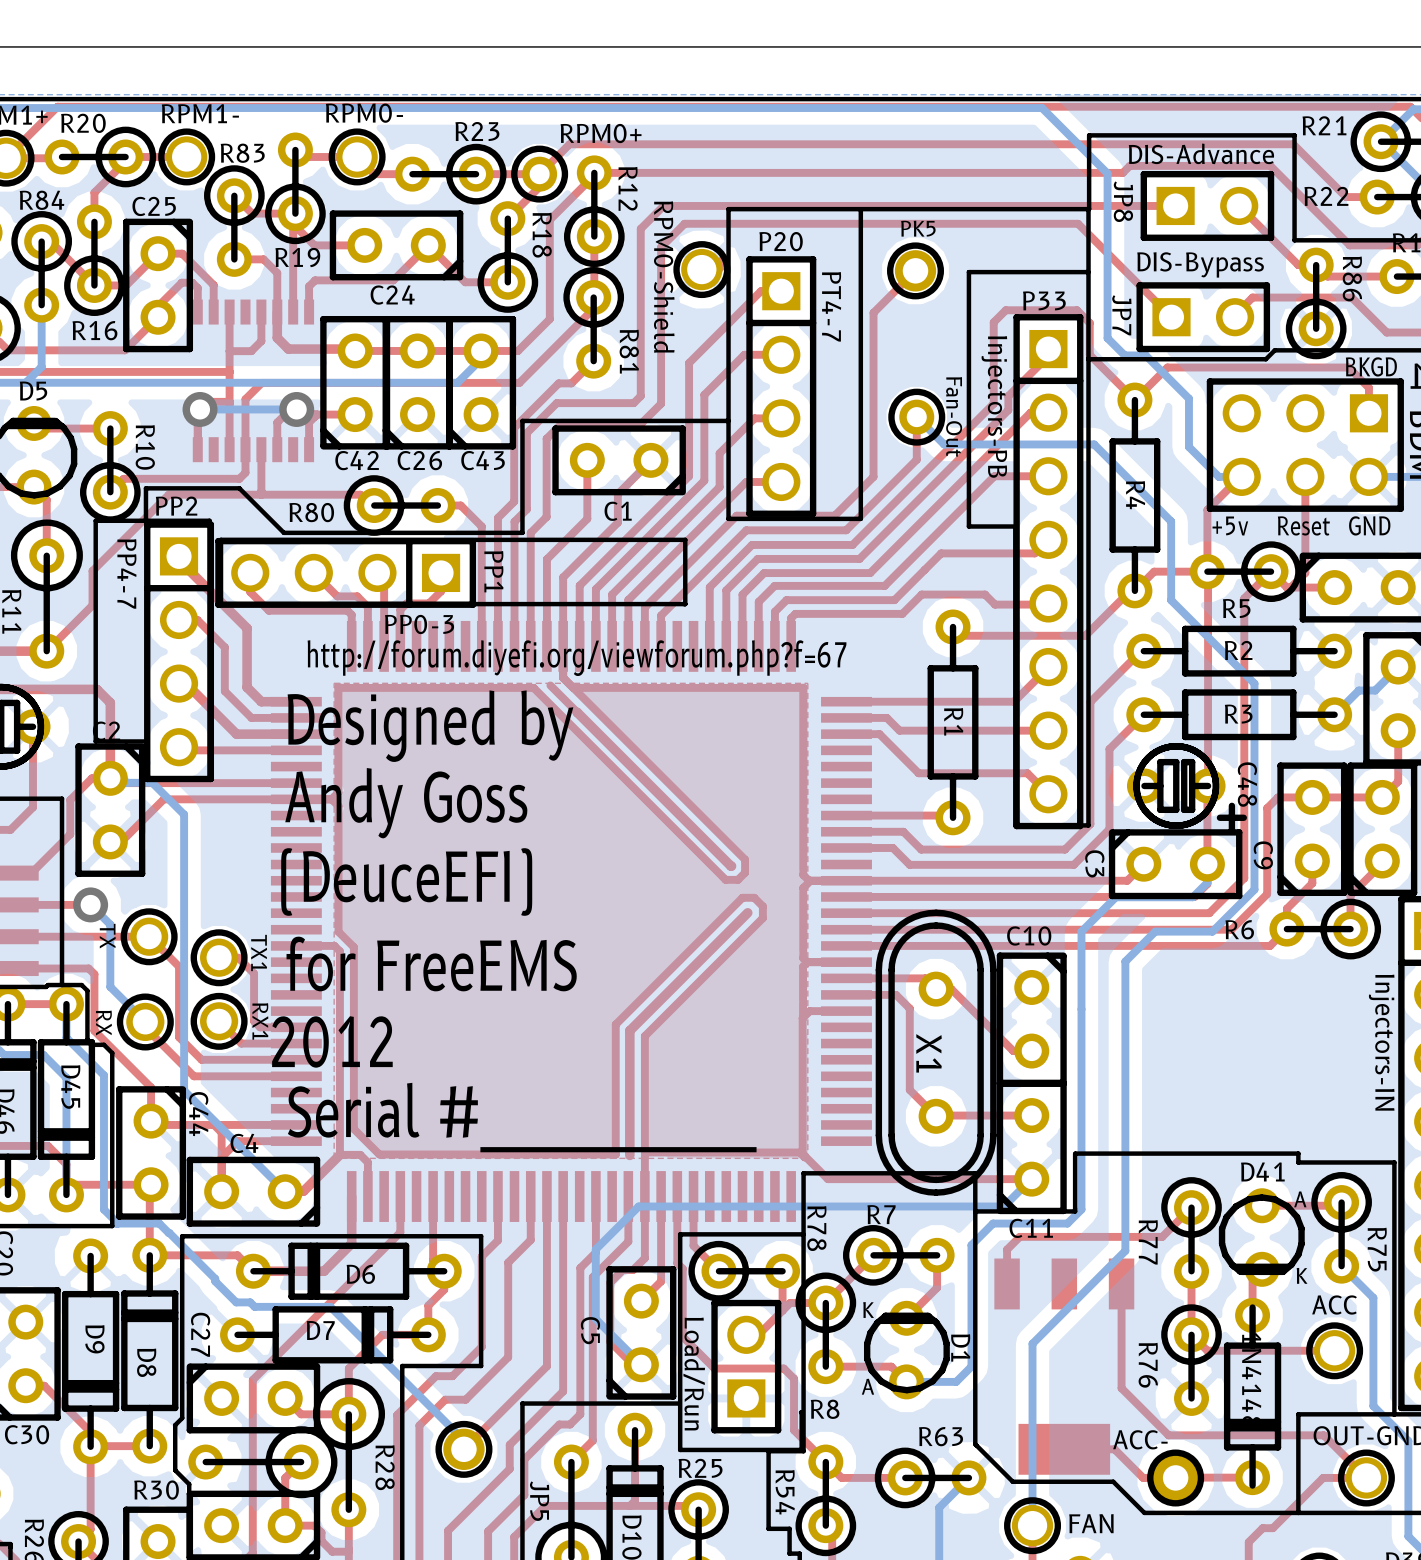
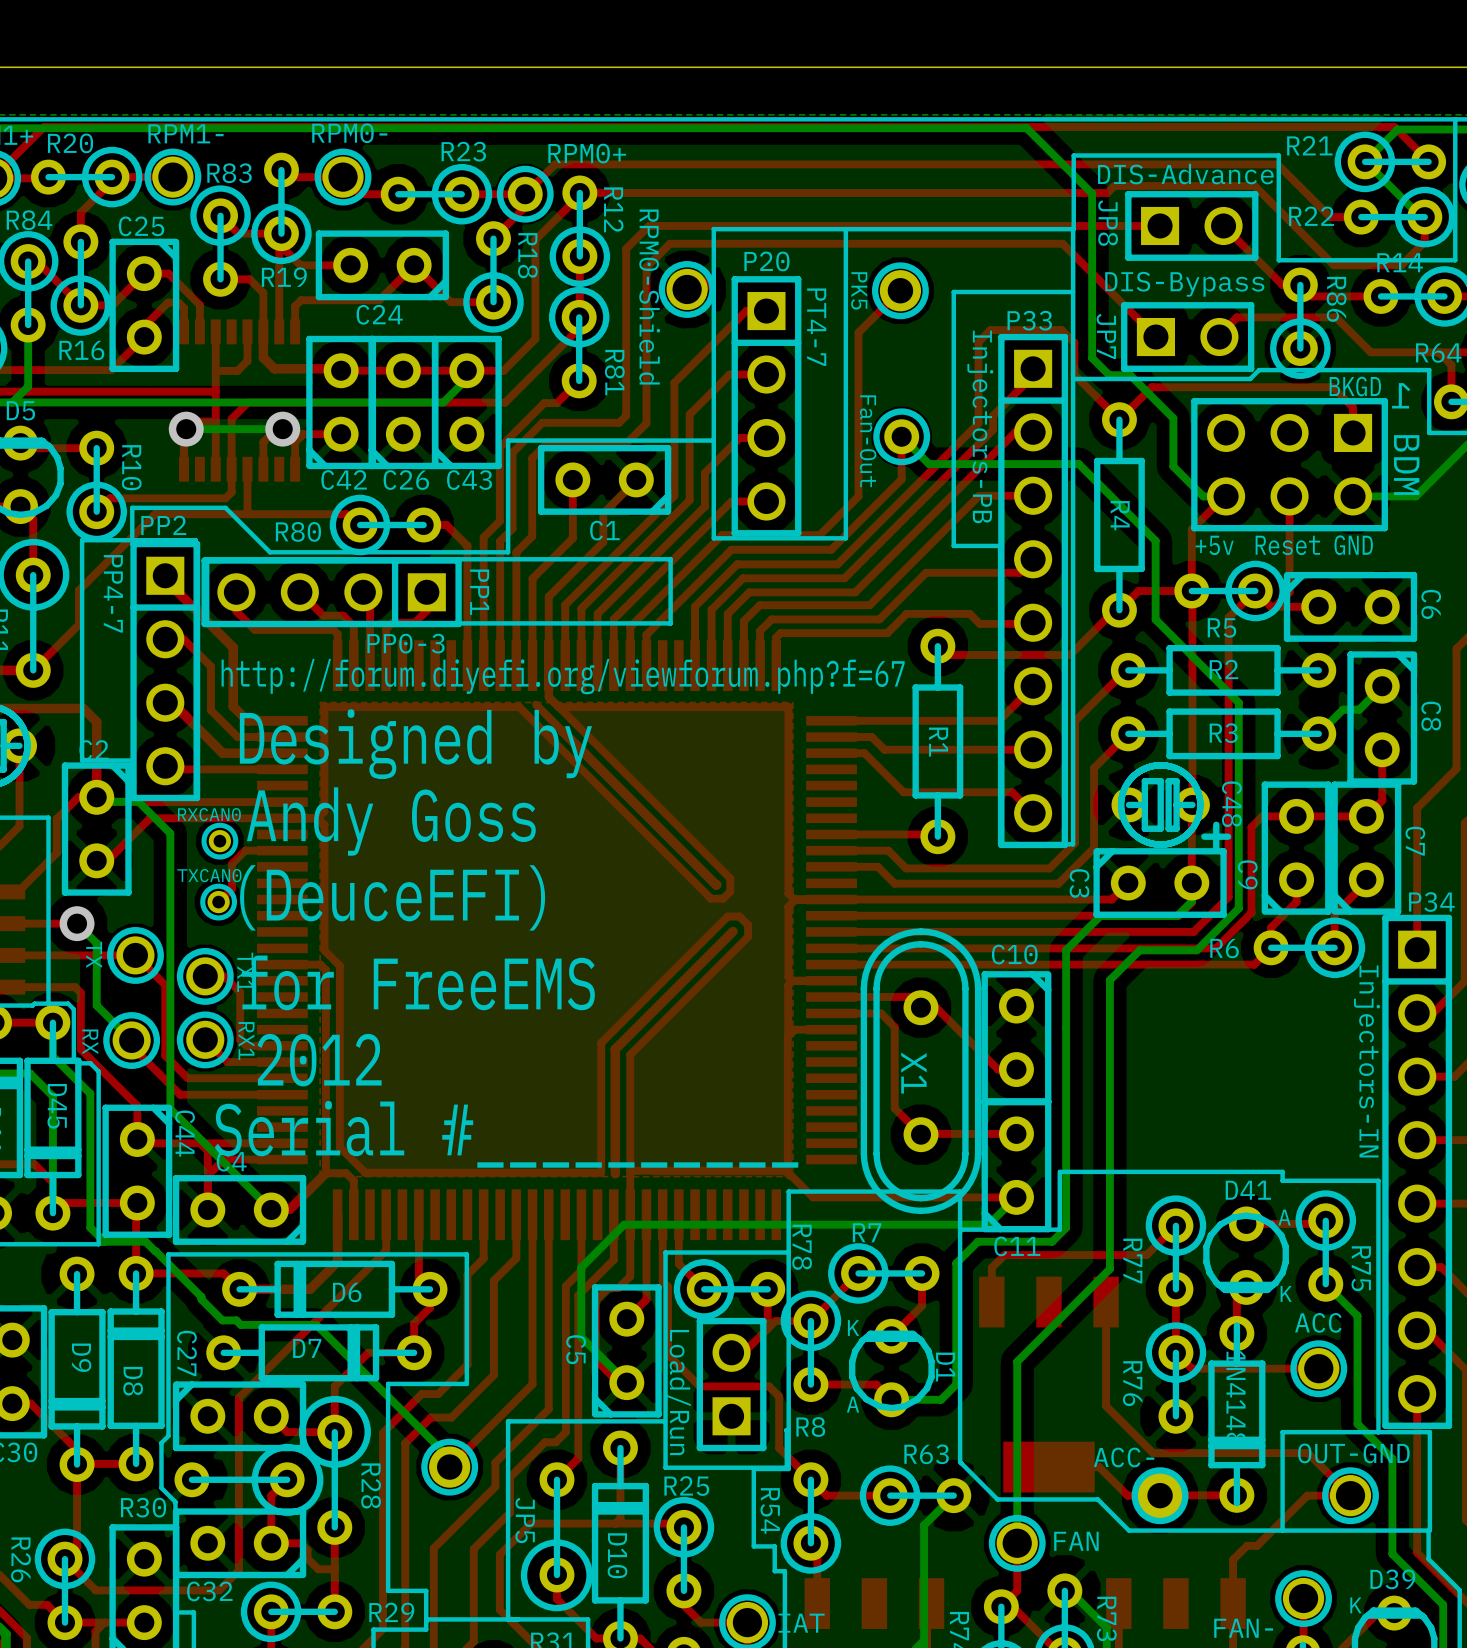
part value rotation: 0° (918, 228) -> 90° clockwise (859, 290)
part value position: PK5 (918, 228) -> PK5 (859, 290)
part value position: Fan-Out (954, 416) -> Fan-Out (868, 441)
part: none -> RXCAN0 (219, 841)
top track: none -> (282, 850) (245, 850) (231, 863) (231, 888) (218, 902)
part: none -> TXCAN0 (218, 902)

